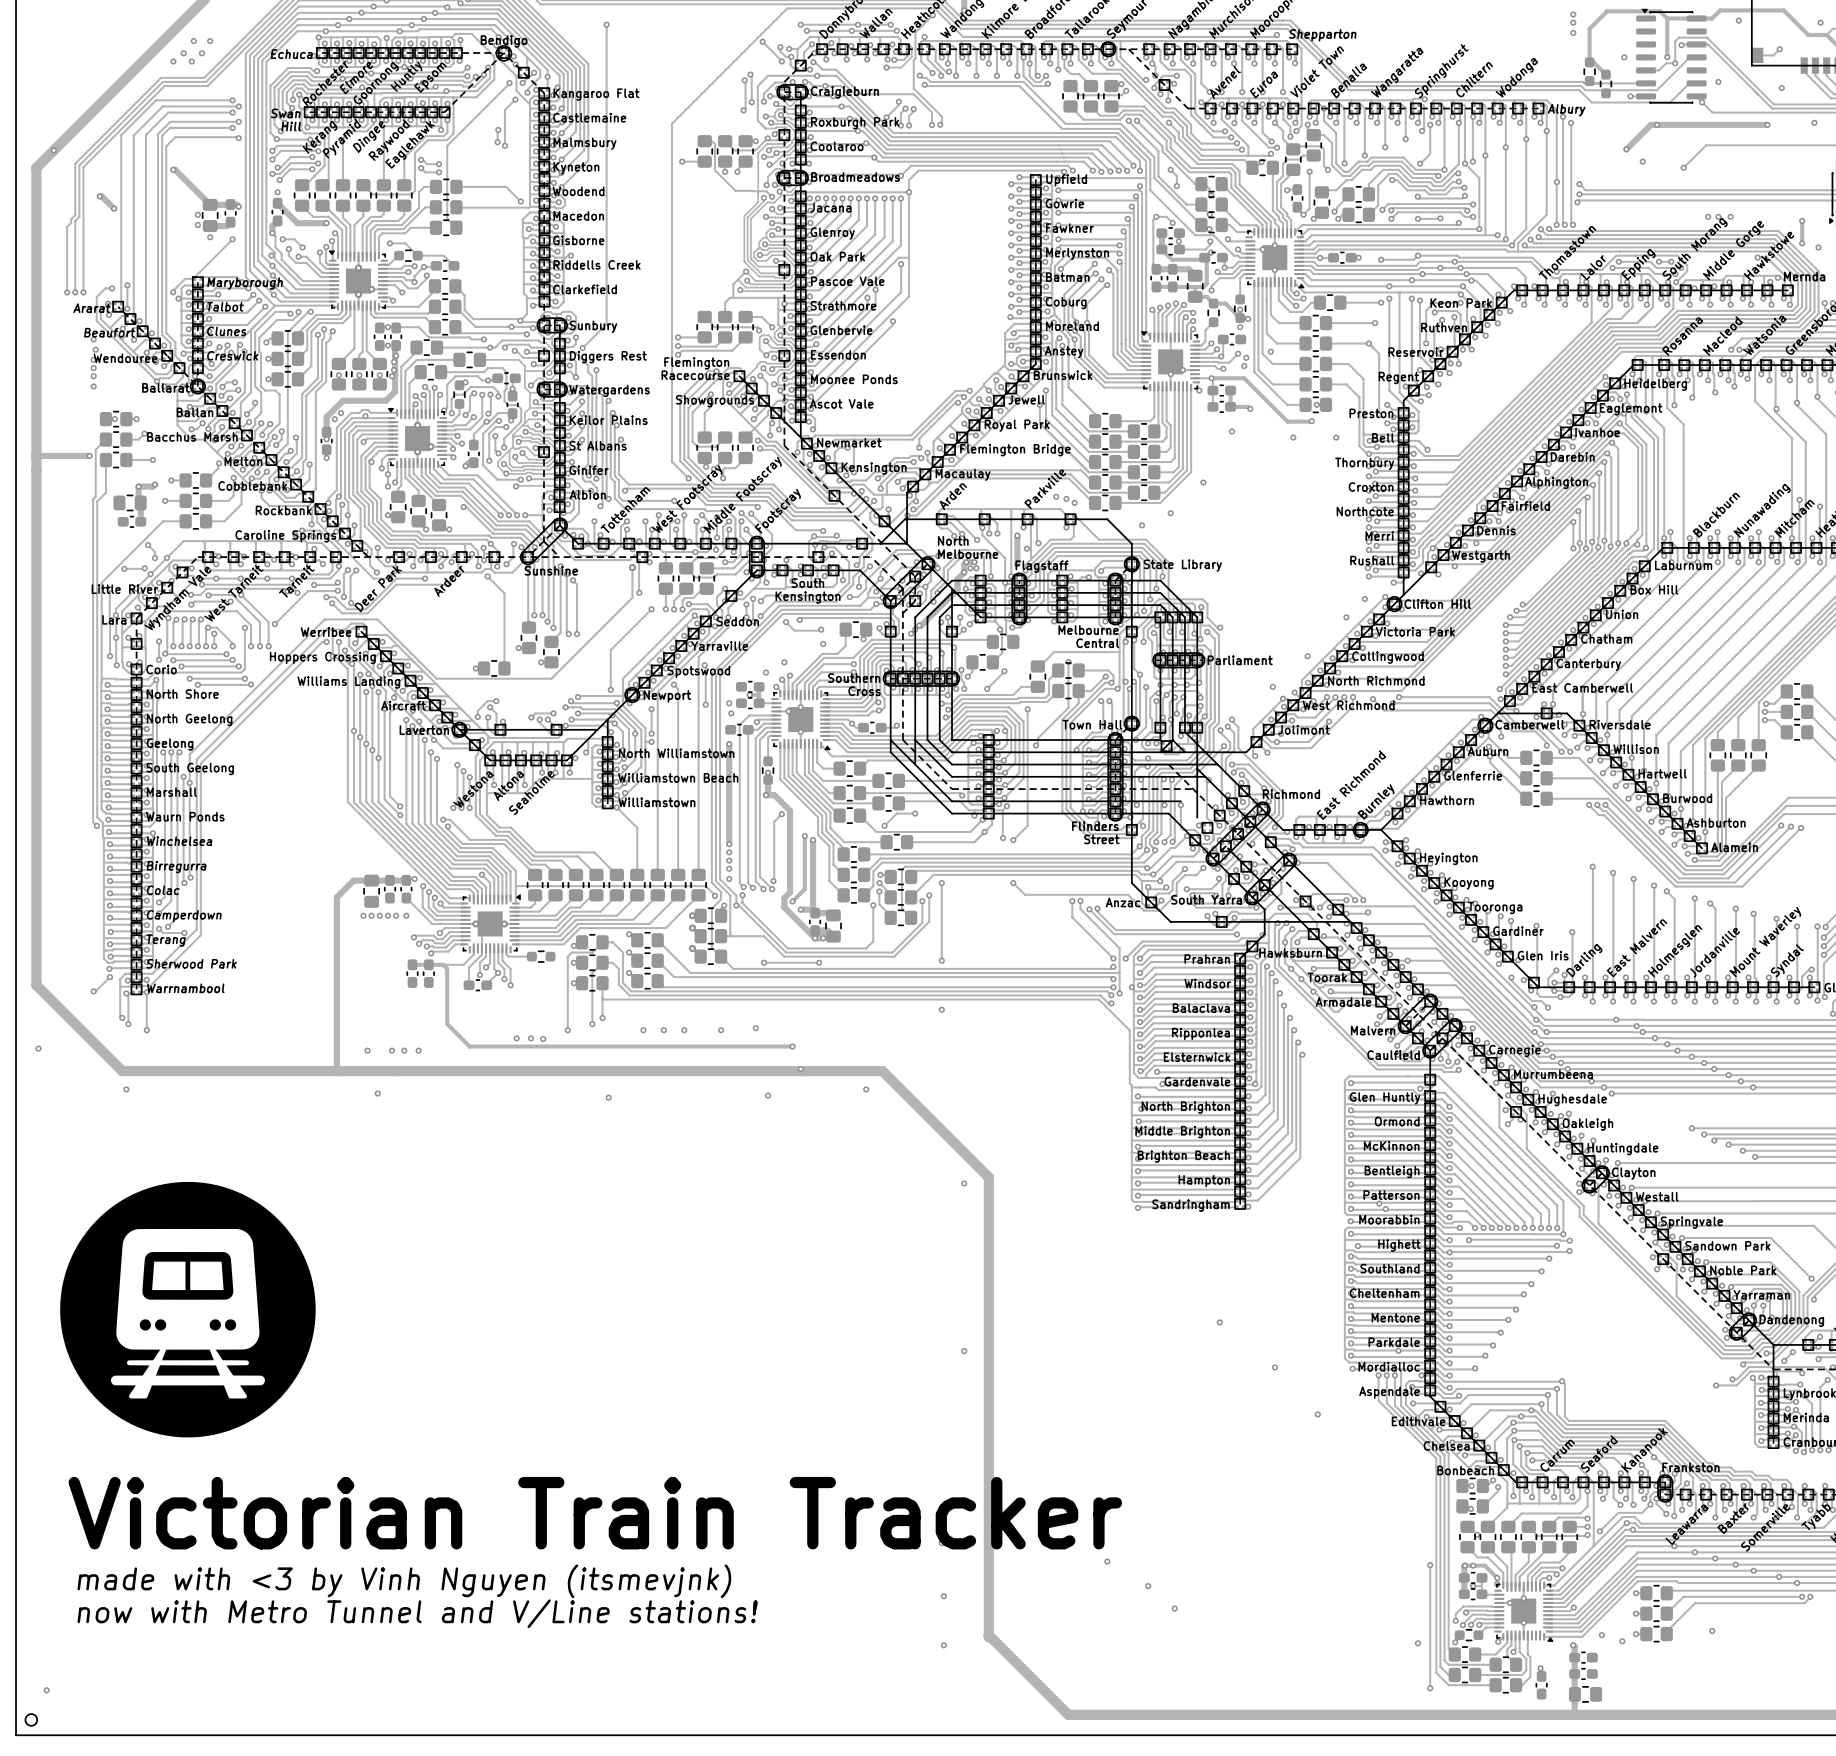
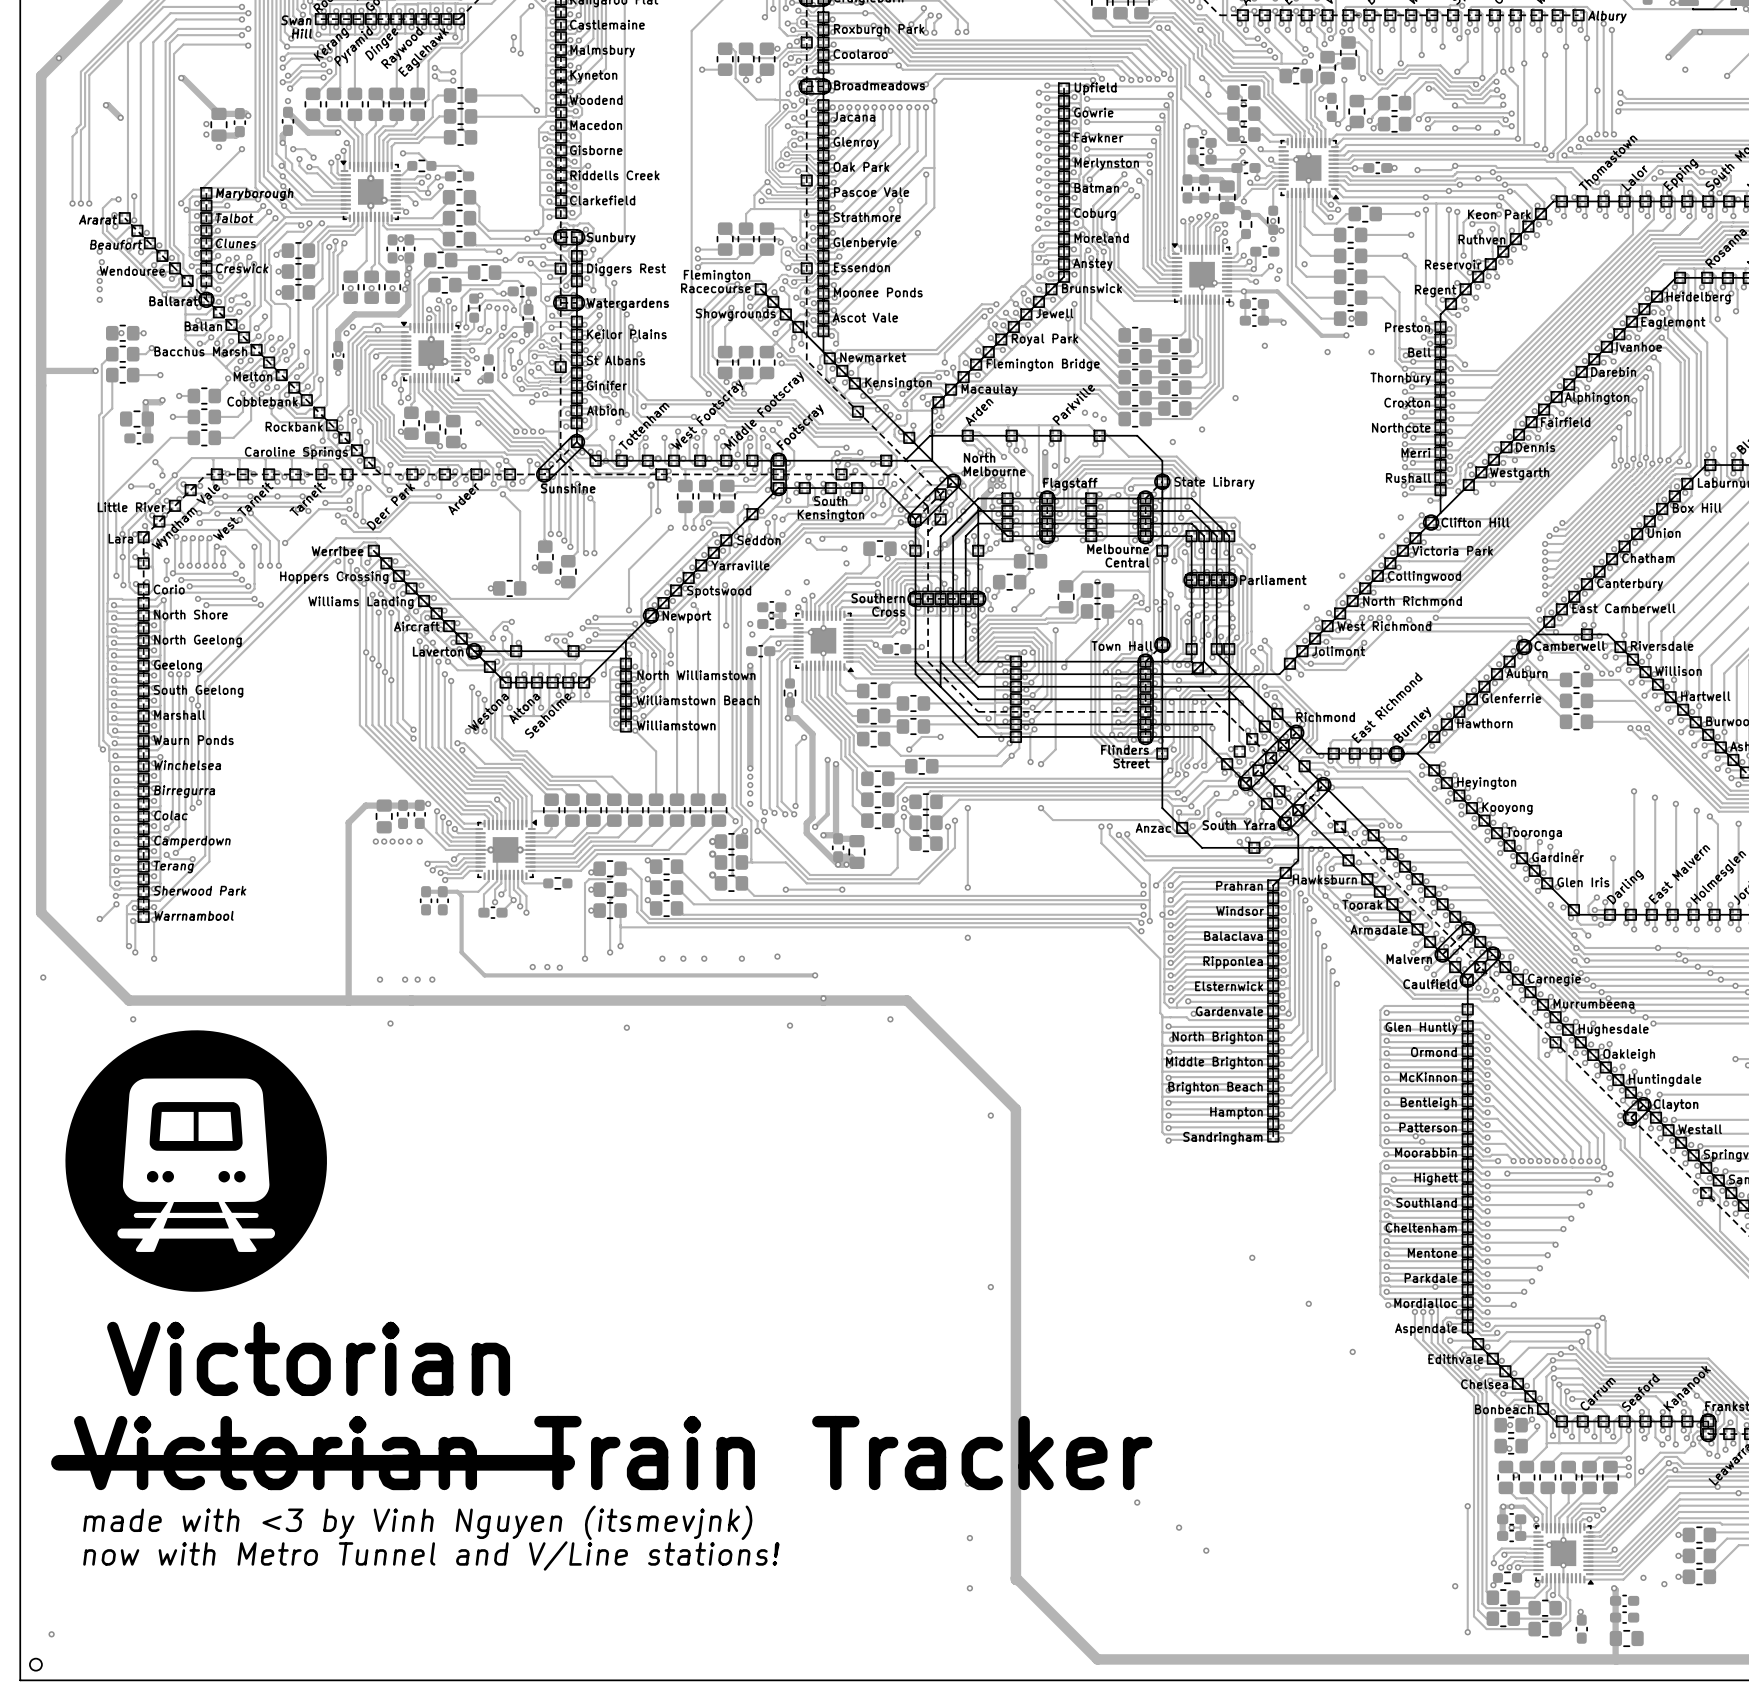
drawing position: (187, 1309) -> (196, 1161)
text: none -> Victorian (308, 1358)
line: none -> (58, 1462) (567, 1462)

